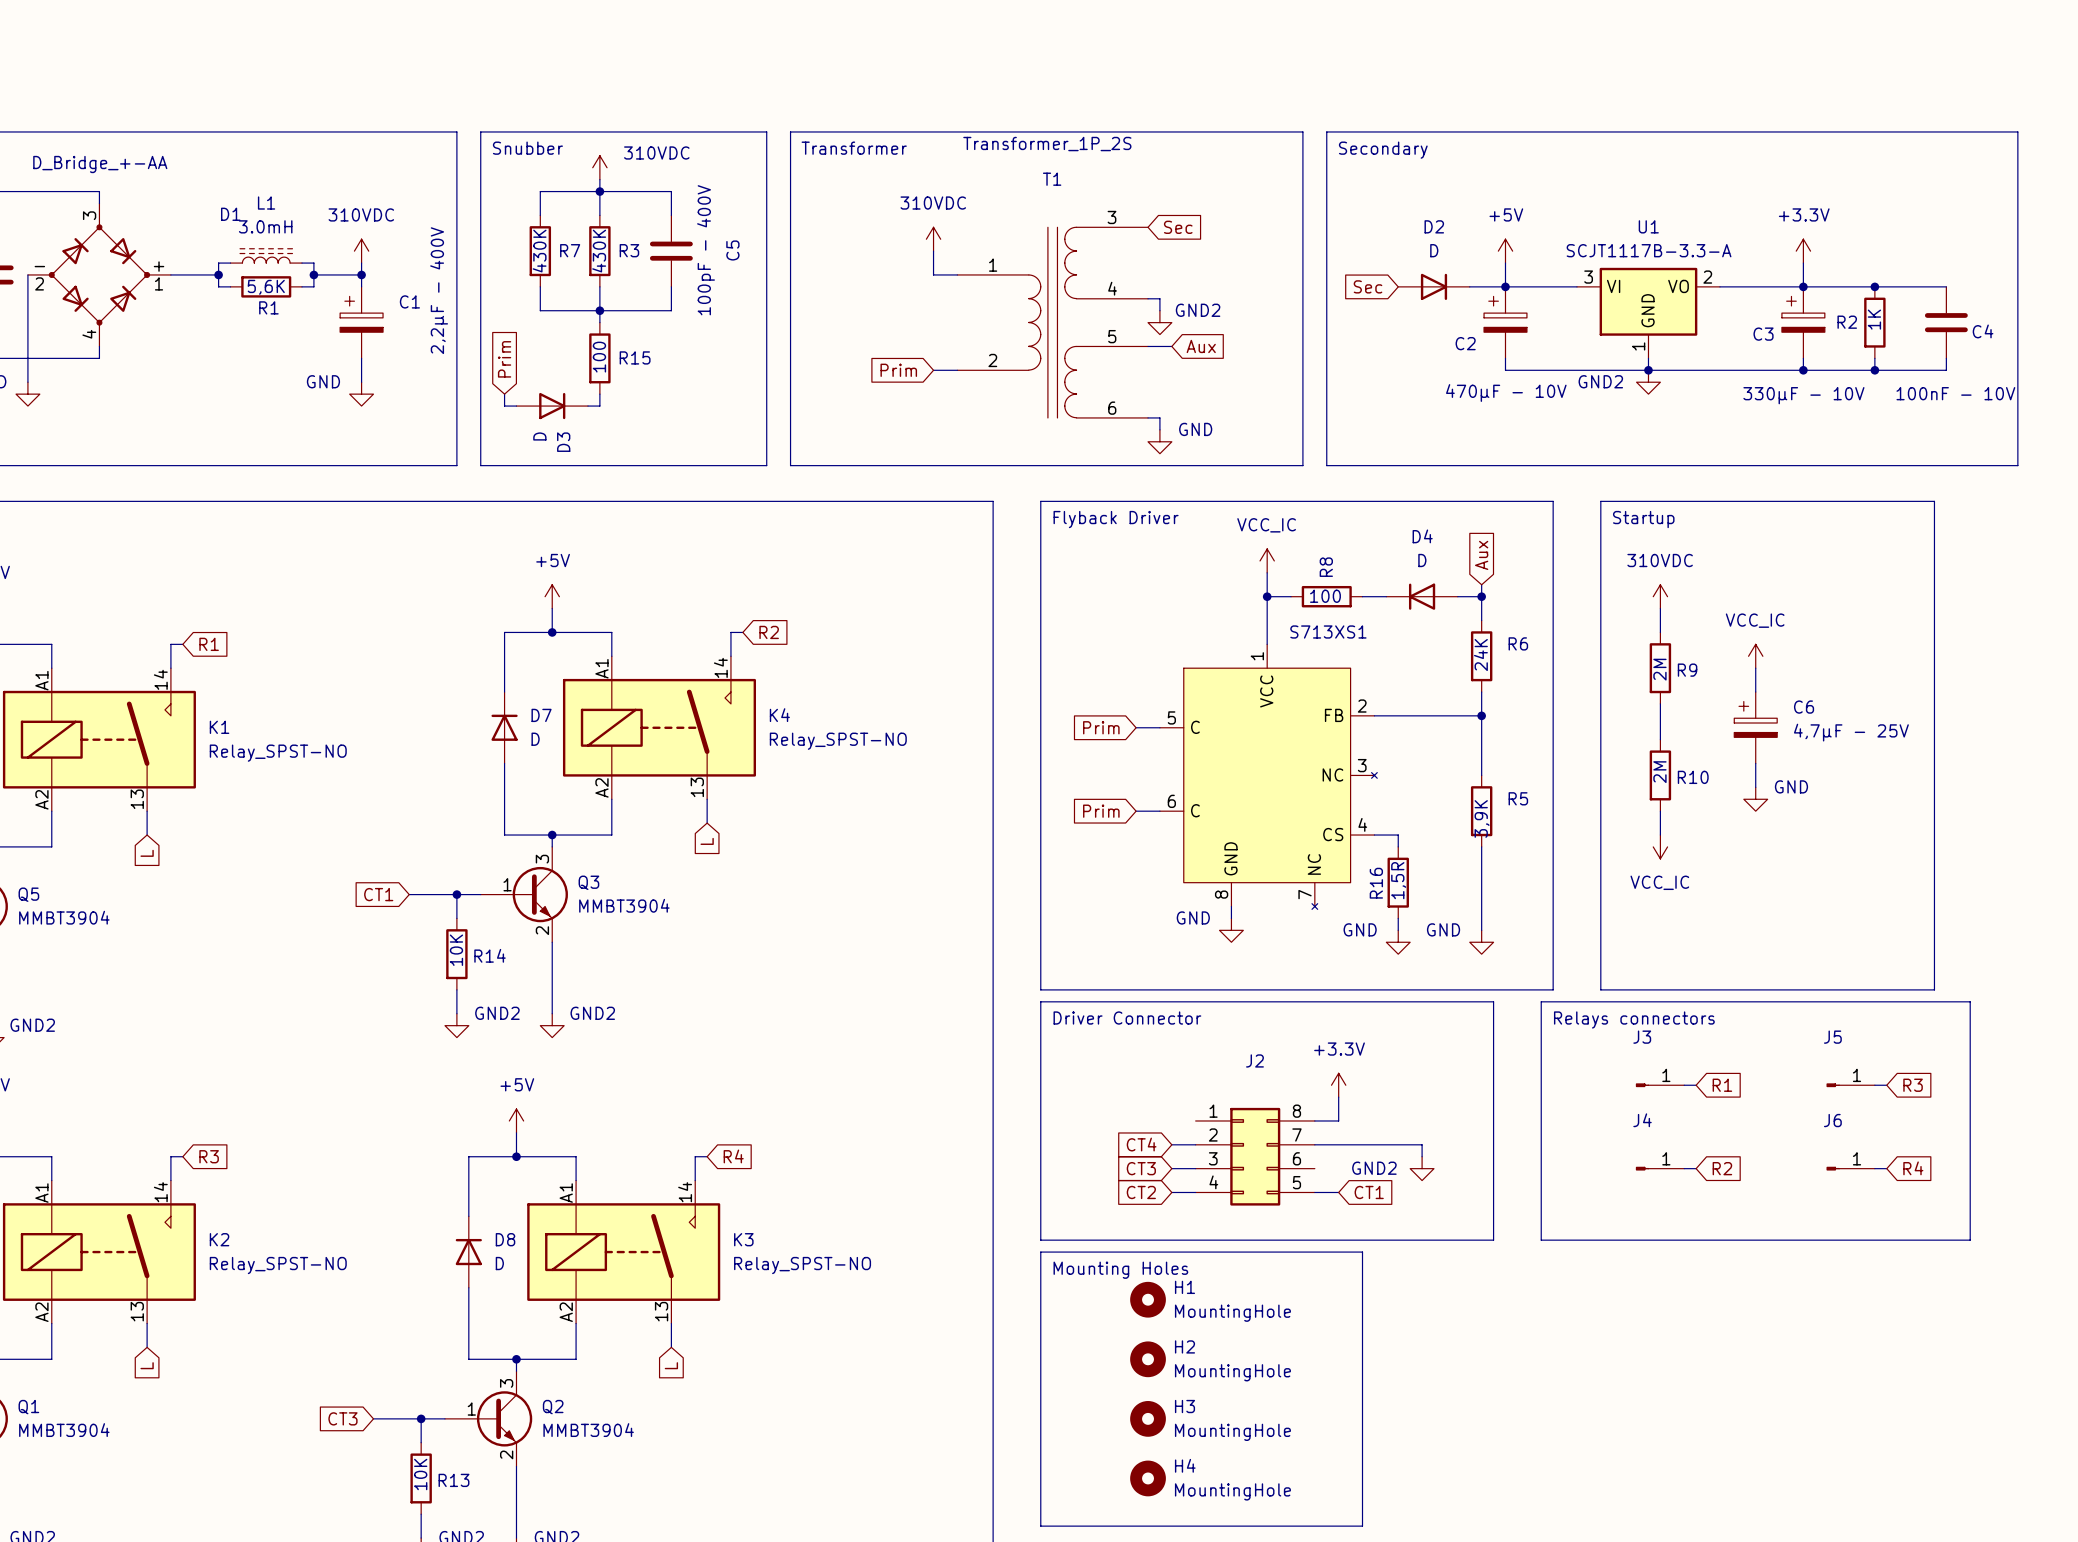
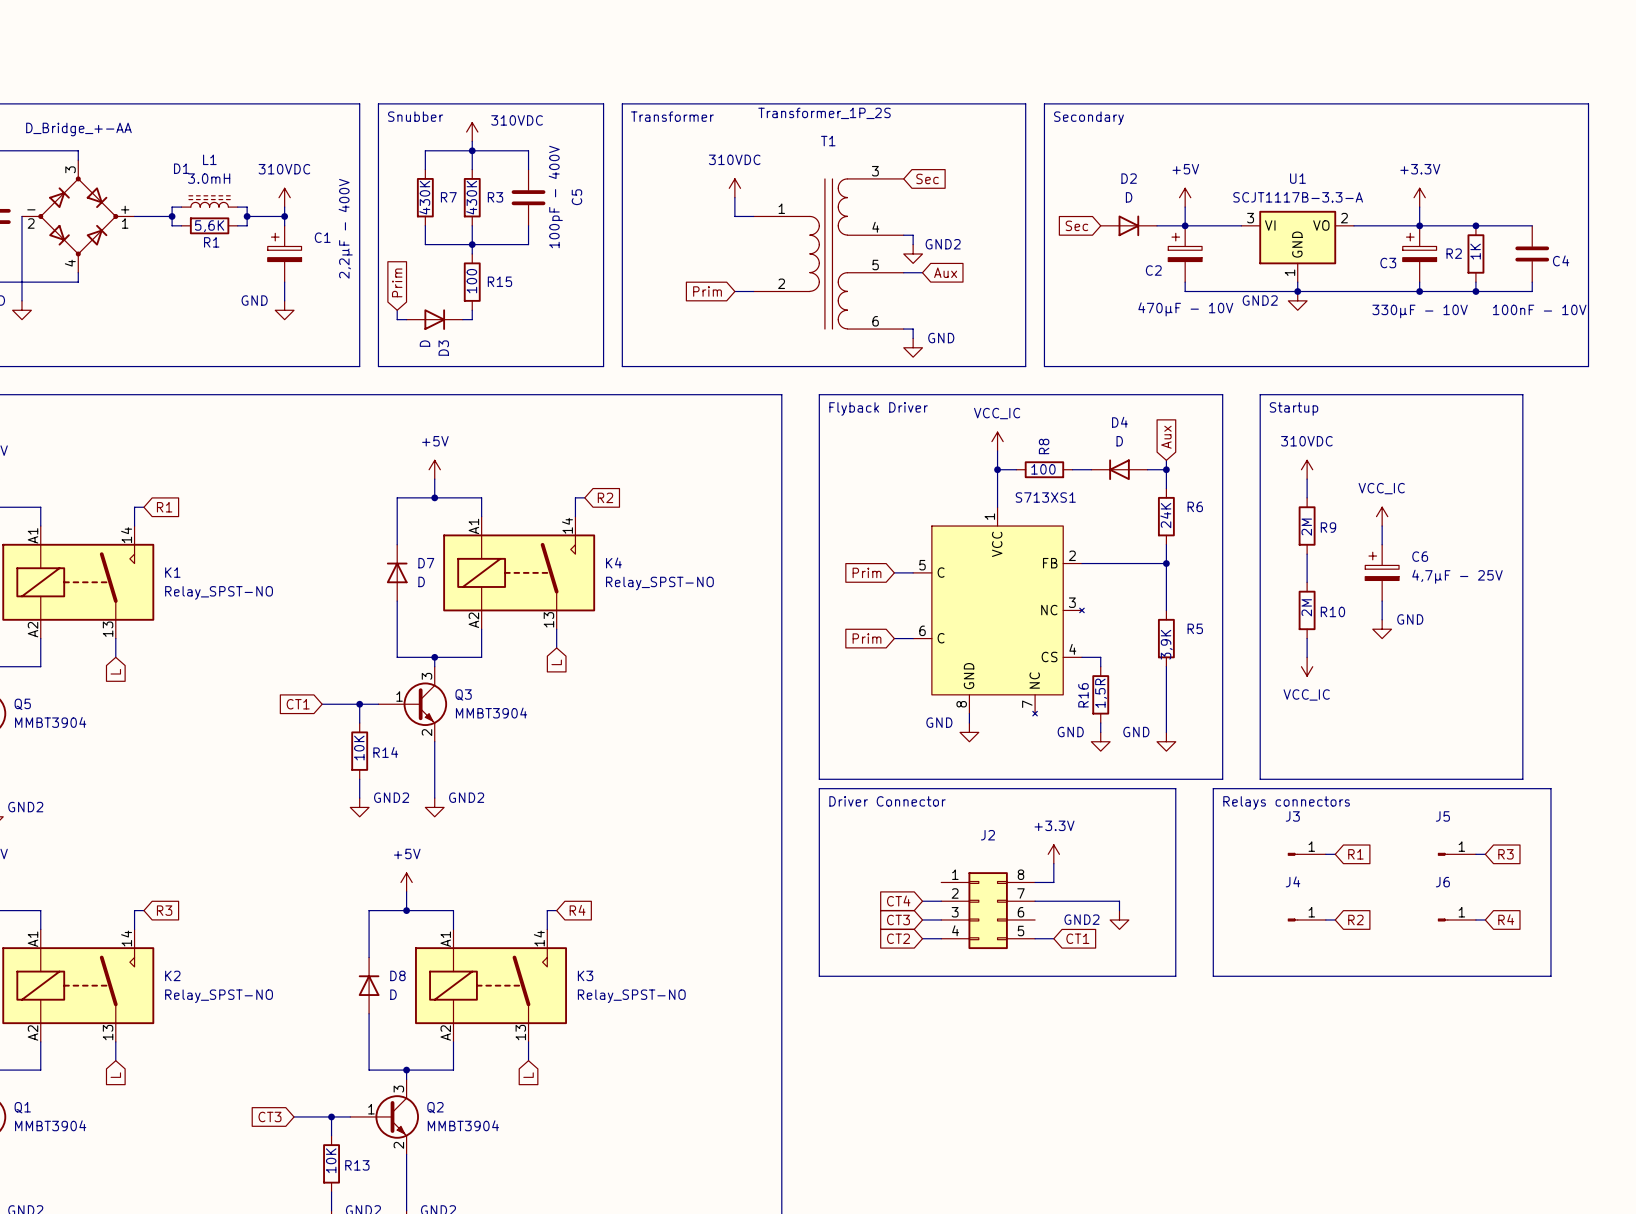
line: (1040, 1252) (1362, 1252) (1362, 1526) (1040, 1526) (1040, 1252) -> none
text: Mounting Holes (1120, 1270) -> none
H1: MountingHole (1148, 1299) -> none
H2: MountingHole (1148, 1359) -> none
H3: MountingHole (1148, 1418) -> none
H4: MountingHole (1148, 1478) -> none

